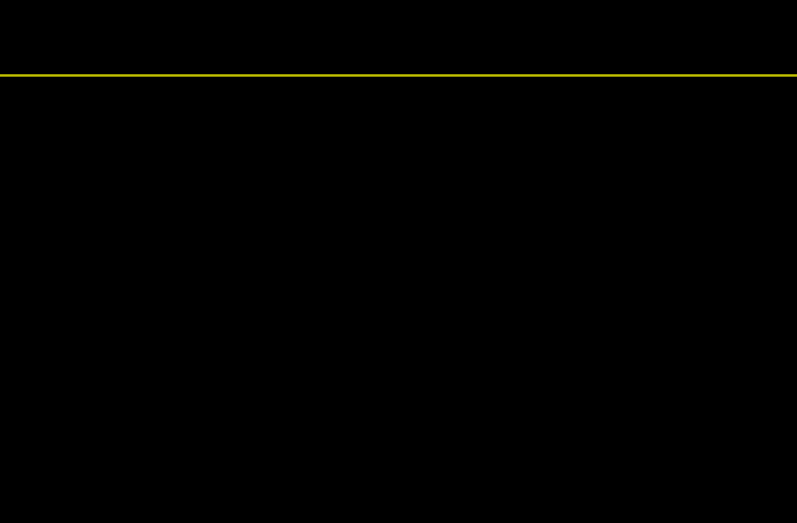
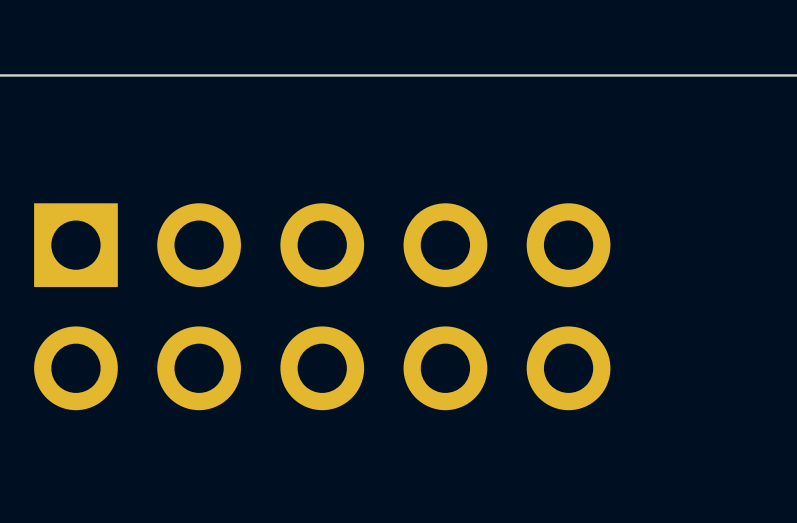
part: none -> (322, 306)

